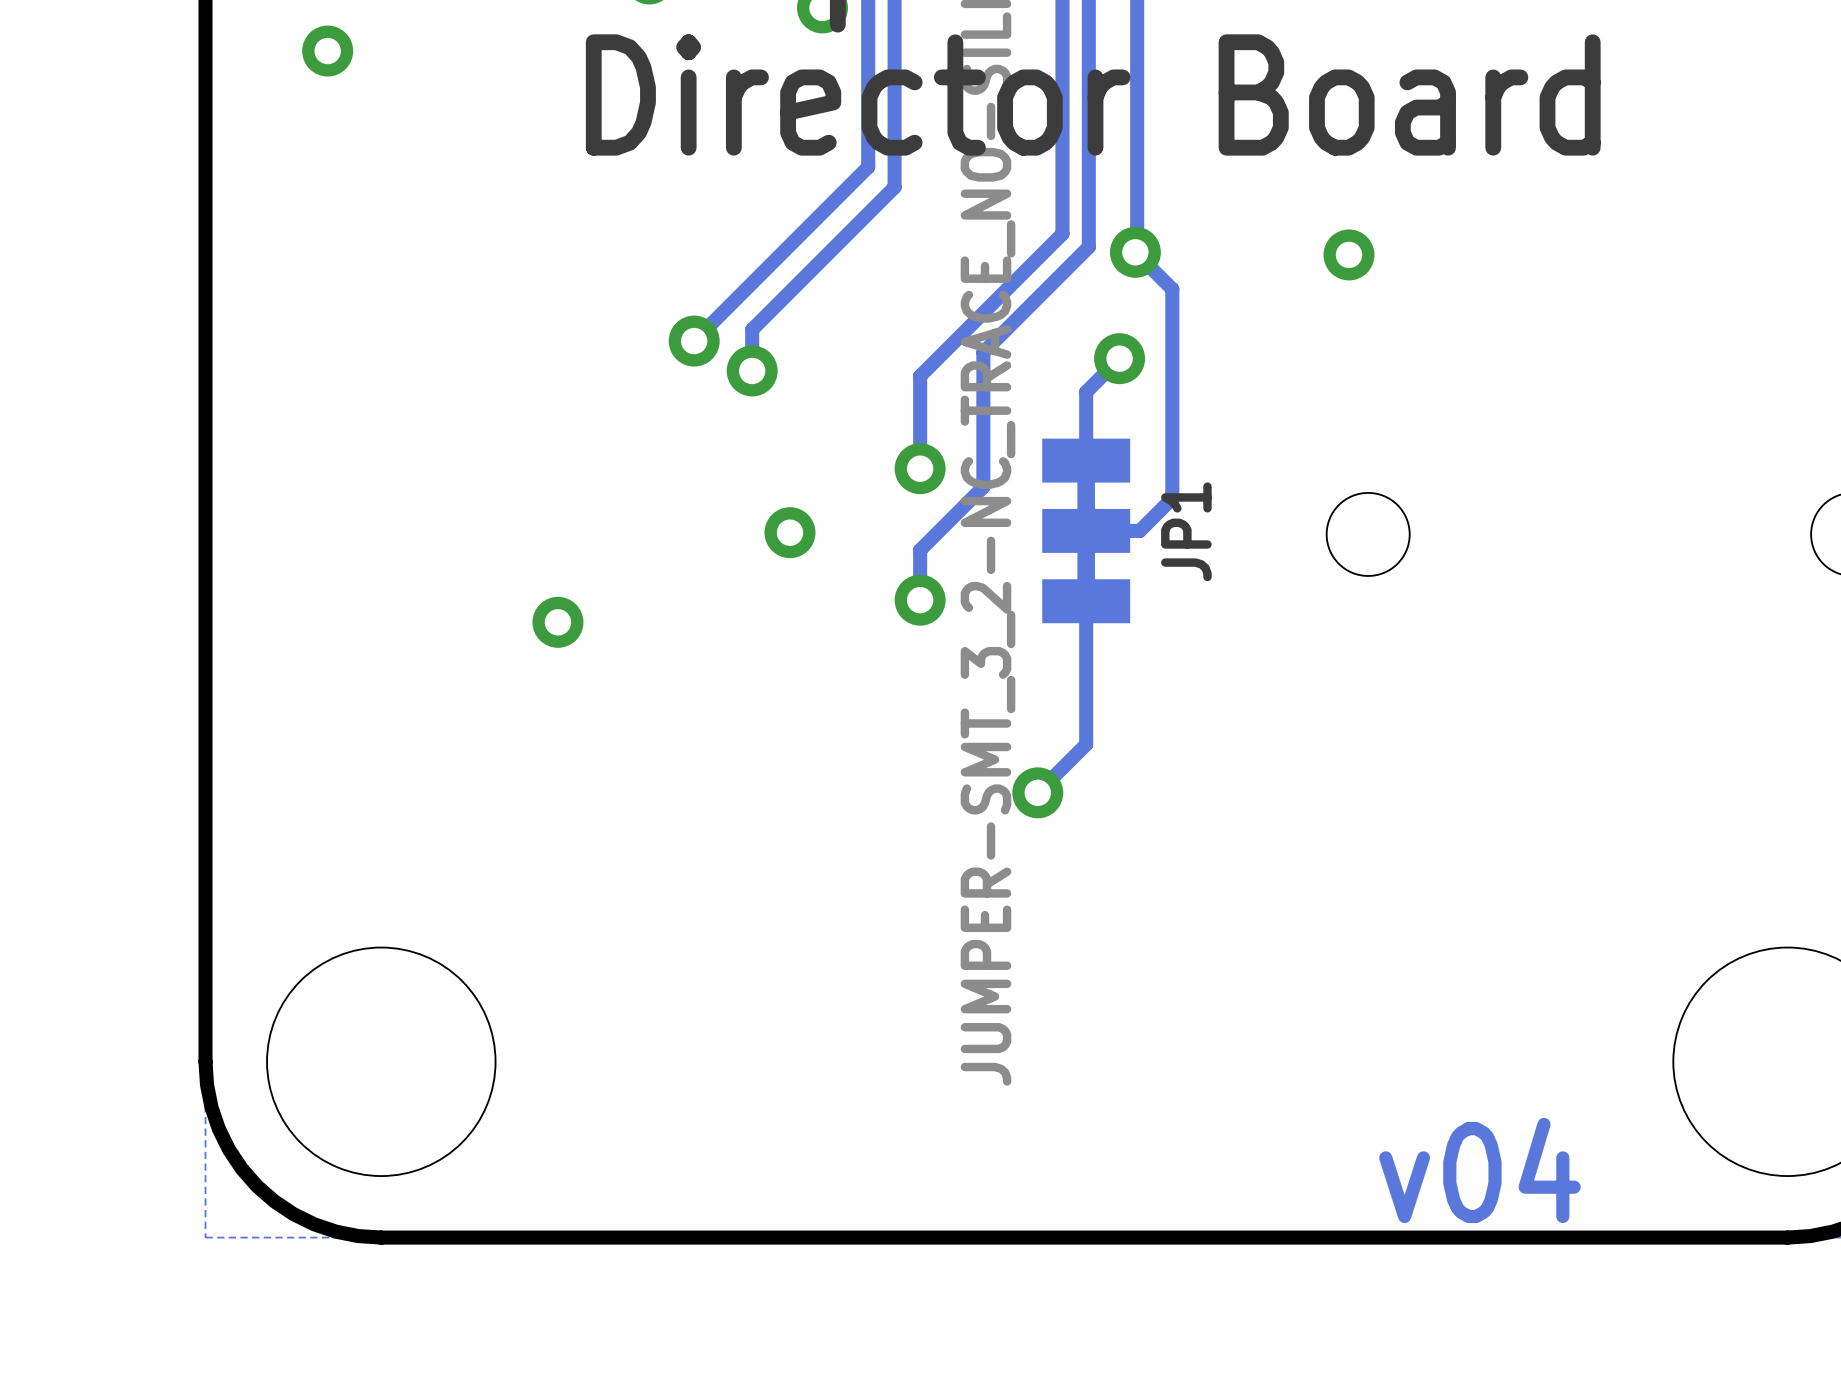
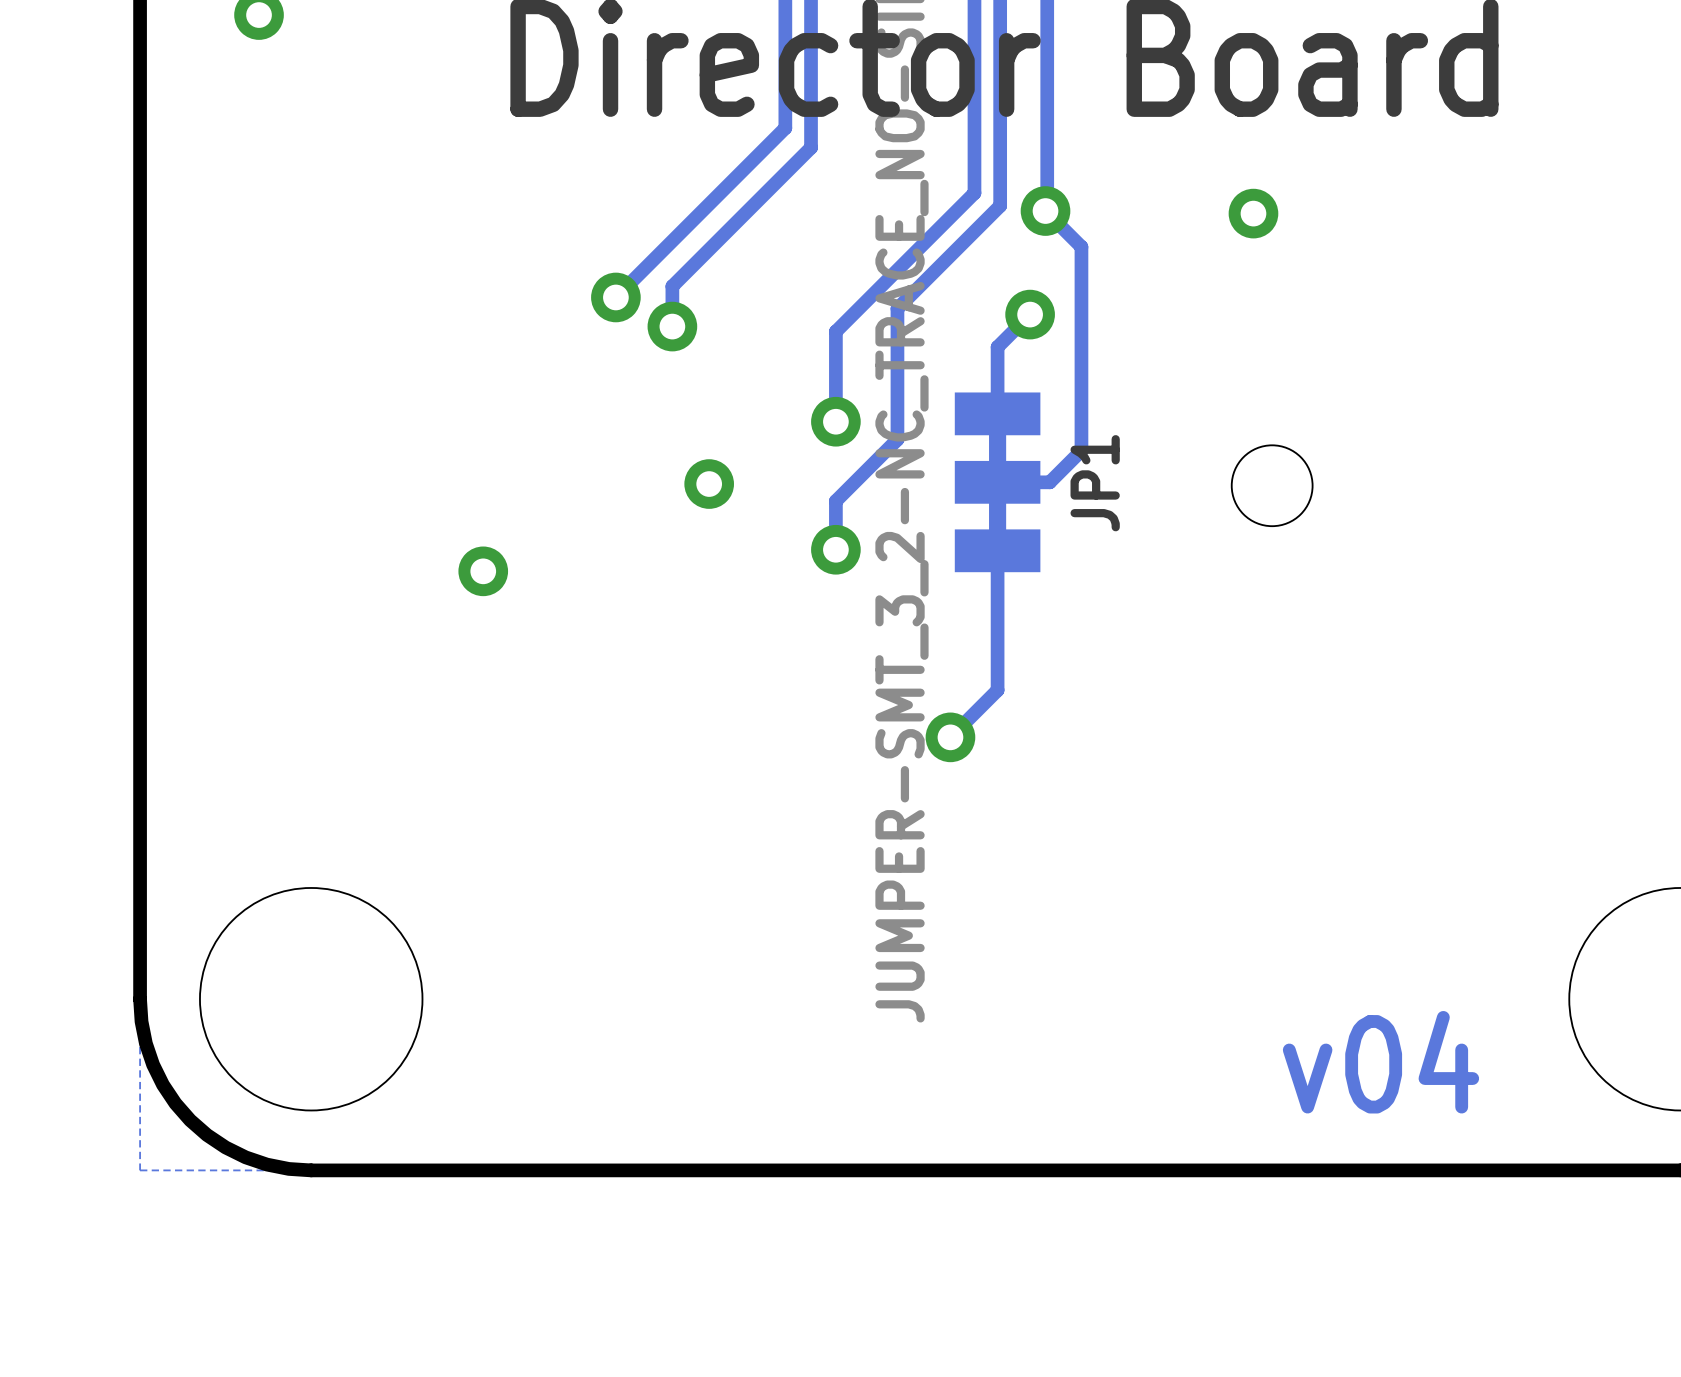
text position: v04 (1479, 1170) -> v04 (1380, 1062)

